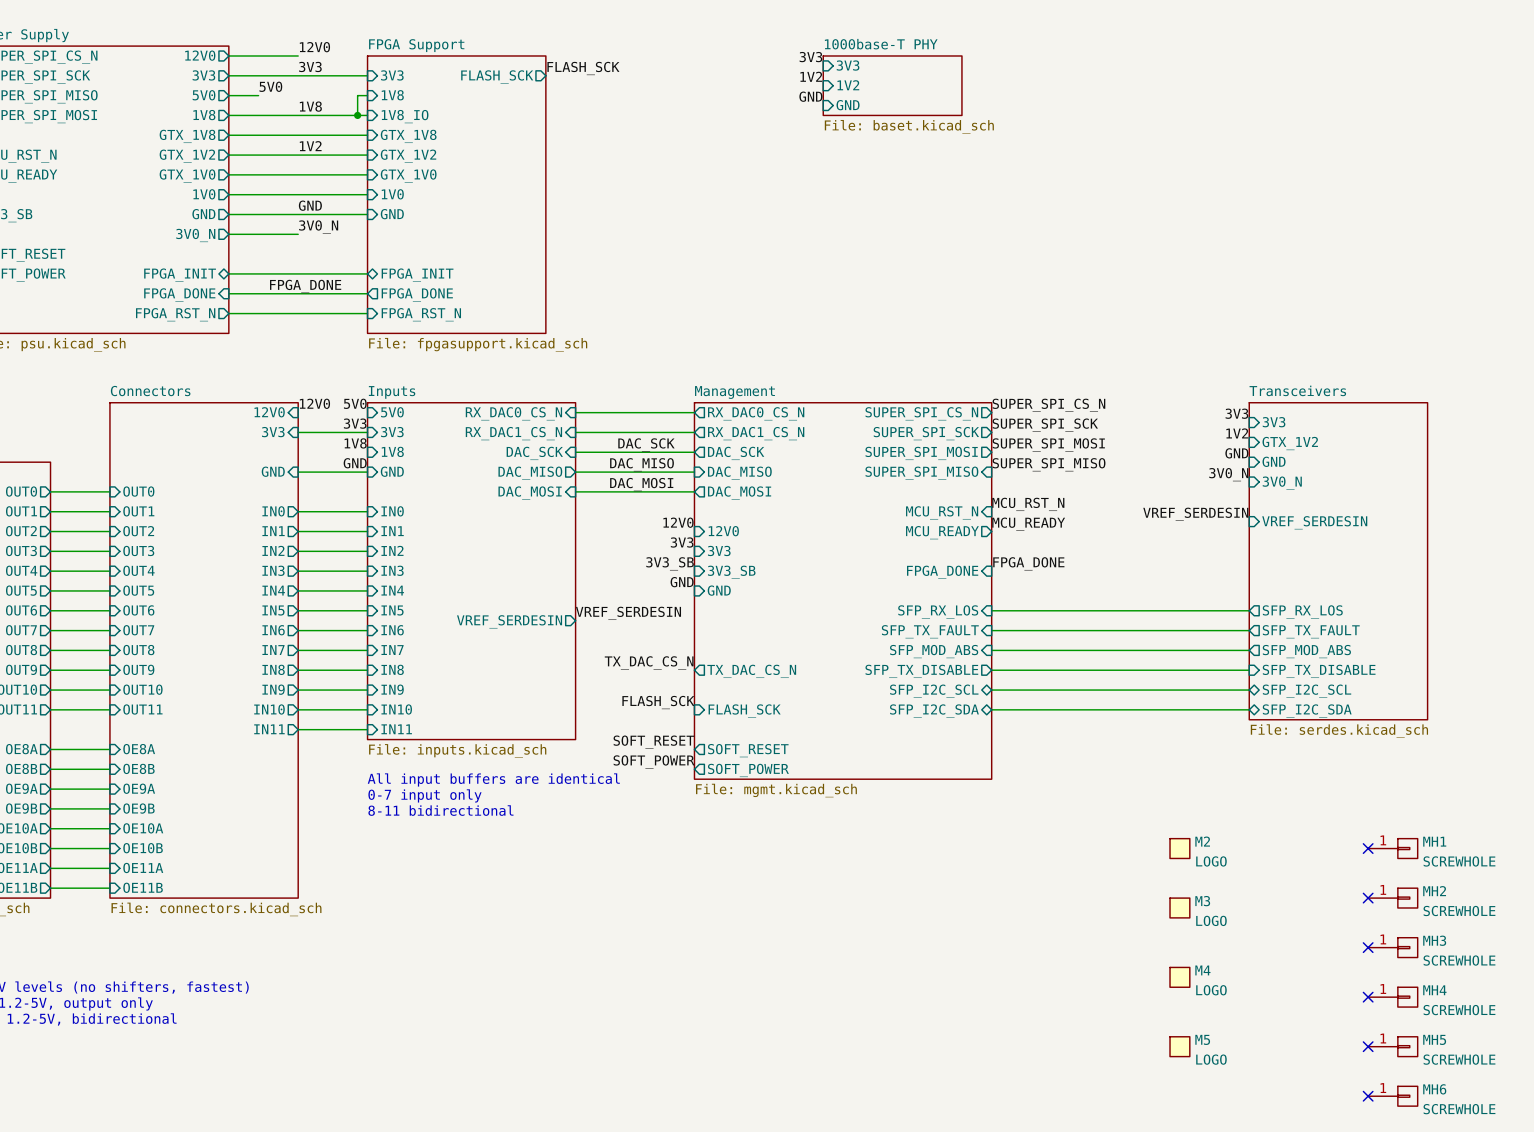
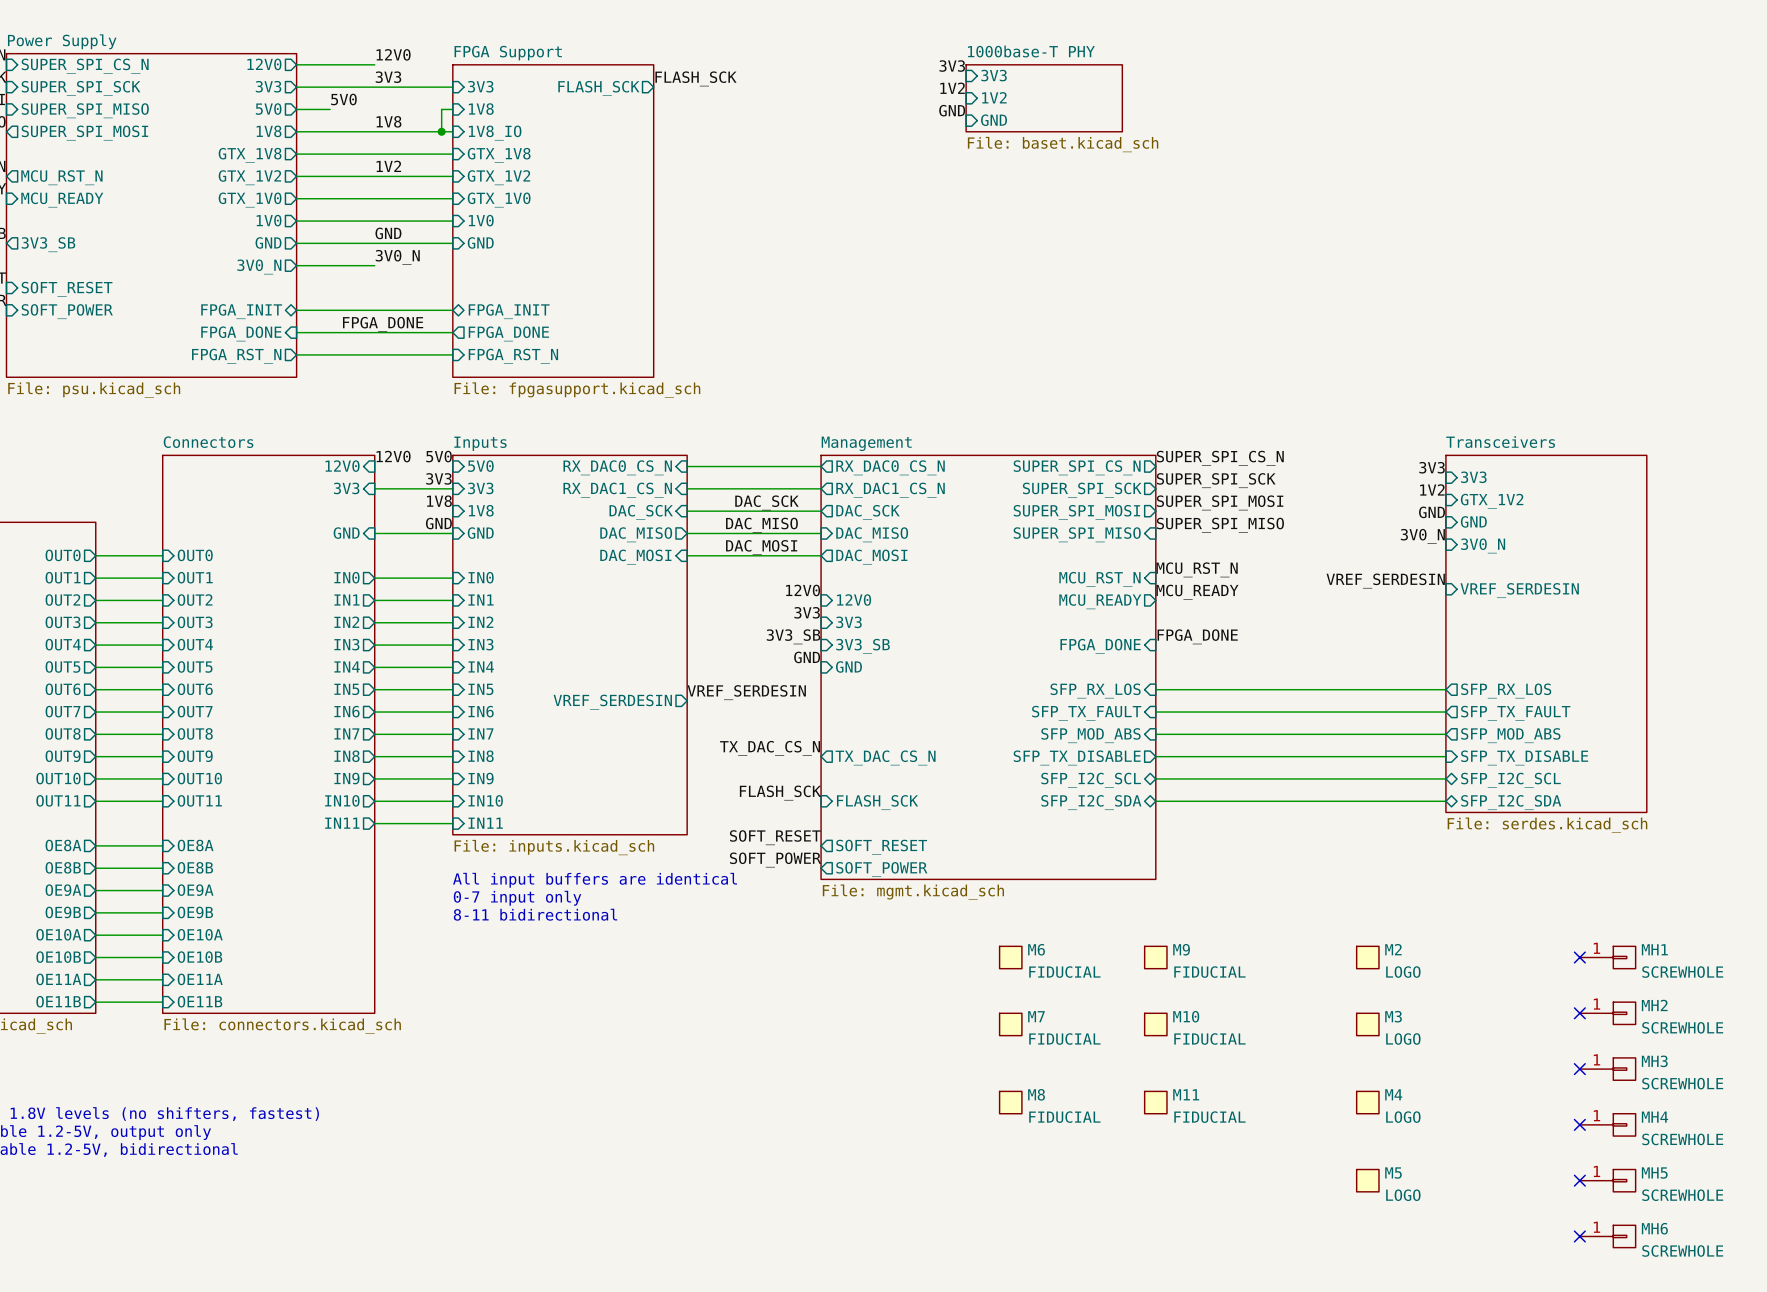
M6: none -> FIDUCIAL (1010, 957)
M9: none -> FIDUCIAL (1155, 957)
M7: none -> FIDUCIAL (1010, 1024)
M10: none -> FIDUCIAL (1155, 1024)
M8: none -> FIDUCIAL (1010, 1102)
M11: none -> FIDUCIAL (1155, 1102)

